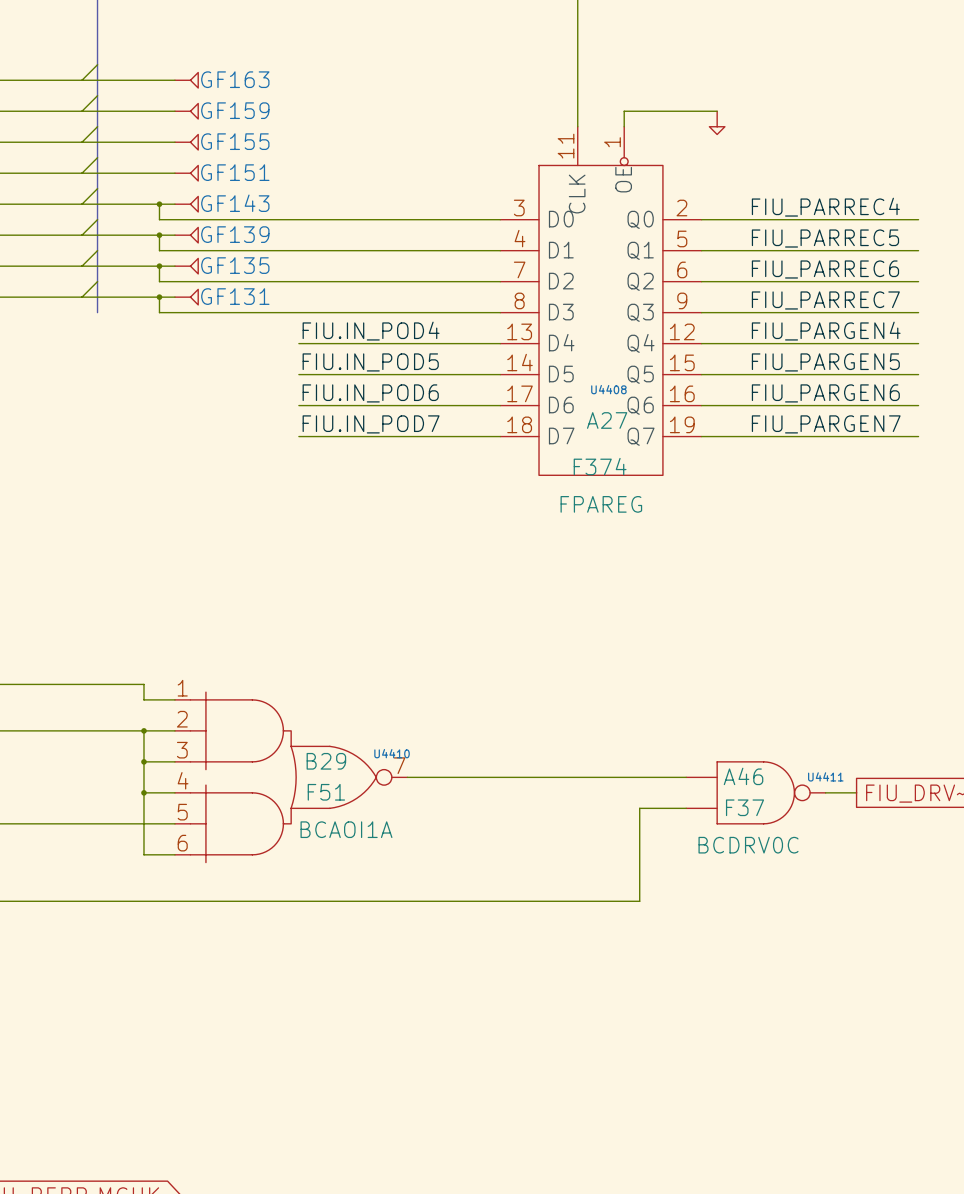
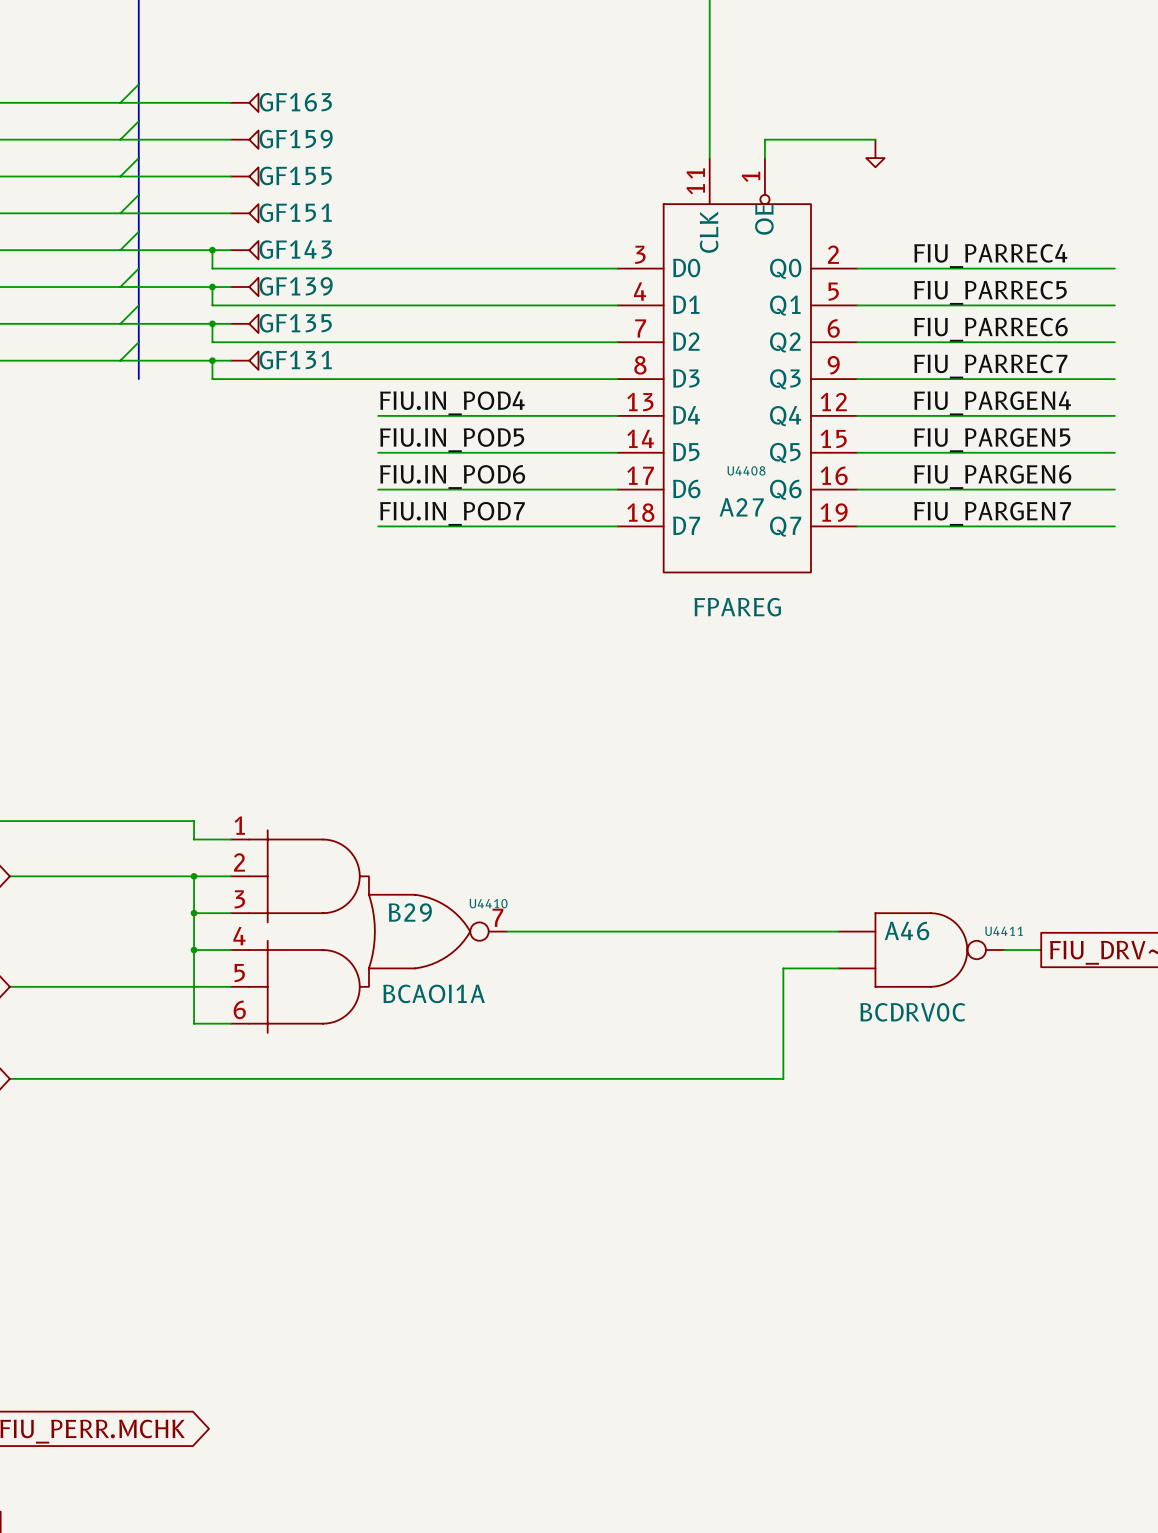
U4408 value: F374 (600, 466) -> none
U4410 value: F51 (326, 792) -> none
U4411 value: F37 (745, 807) -> none

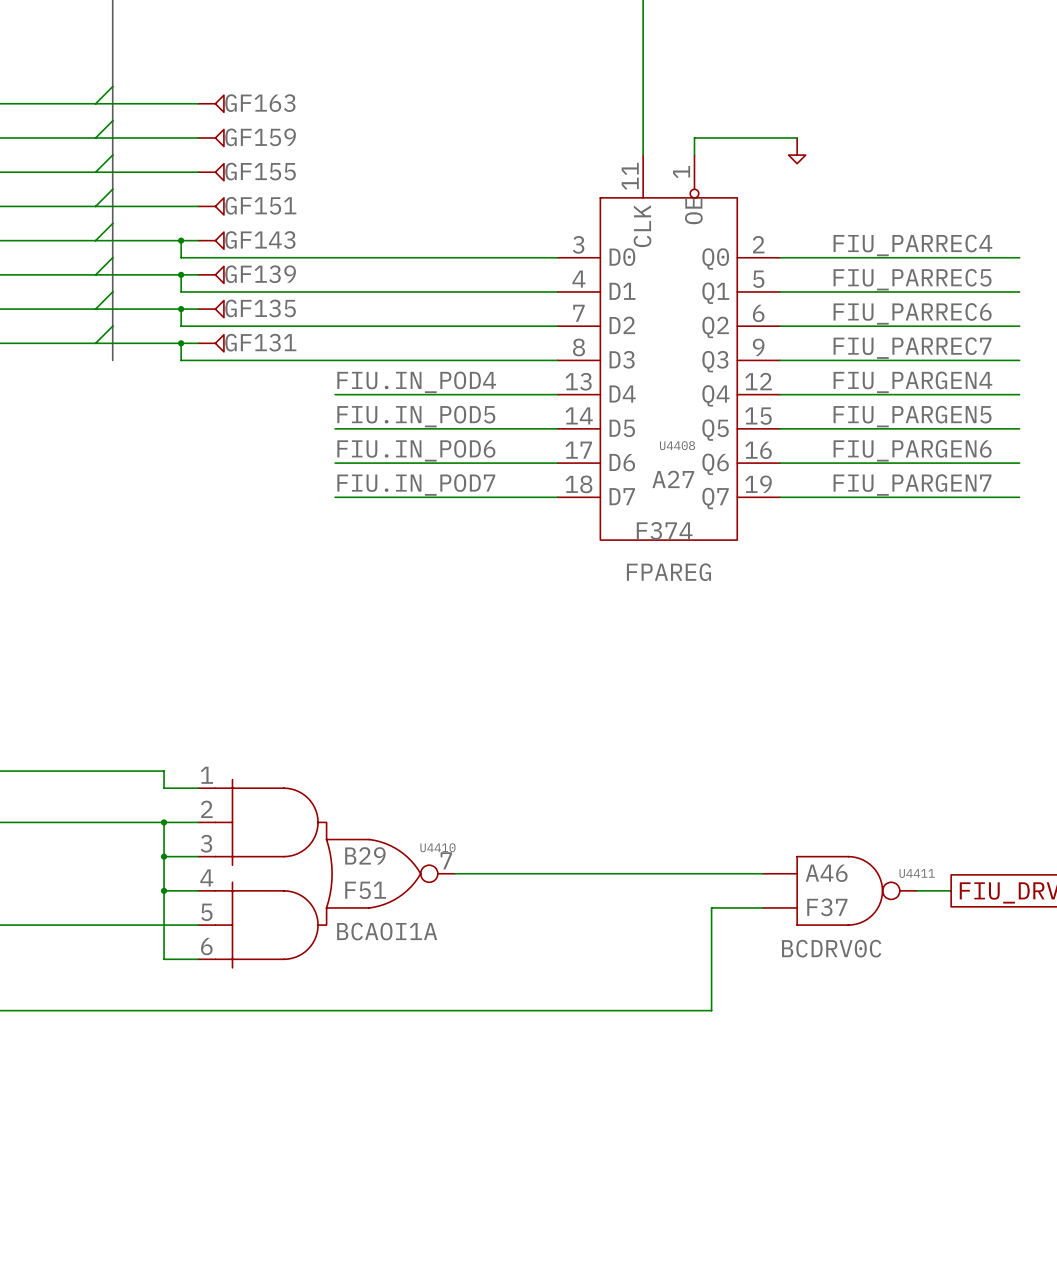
U4408 value: none -> F374 (664, 530)
U4410 value: none -> F51 (365, 890)
U4411 value: none -> F37 (827, 907)

